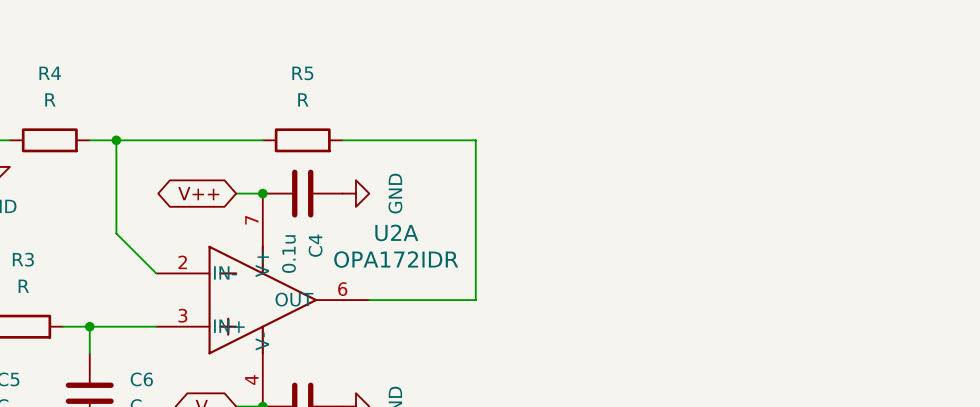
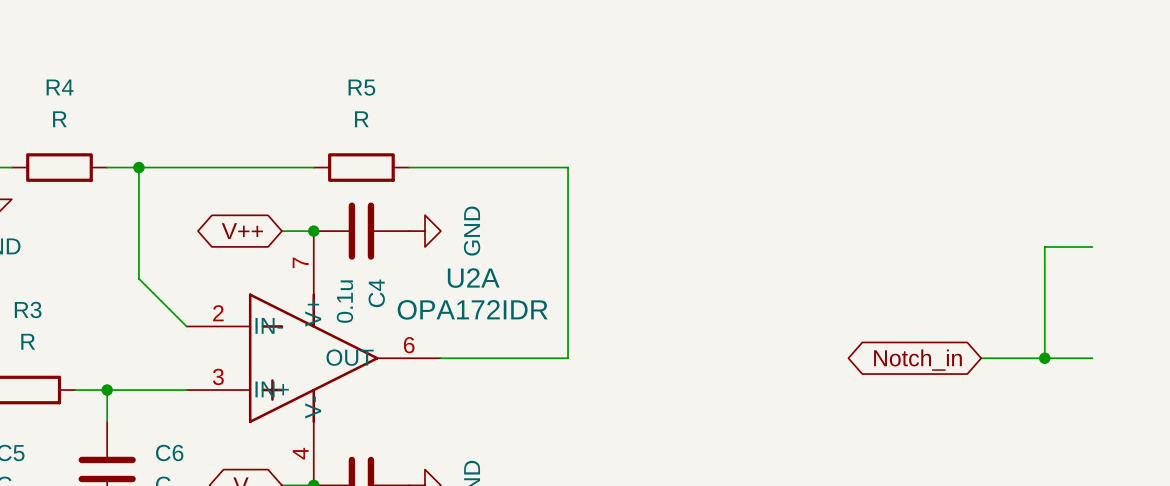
wire: none -> (1092, 247) (1044, 247) (1044, 358)
wire: none -> (981, 358) (1092, 358)
junction: none -> (1044, 358)
global label: none -> Notch_in (917, 360)

